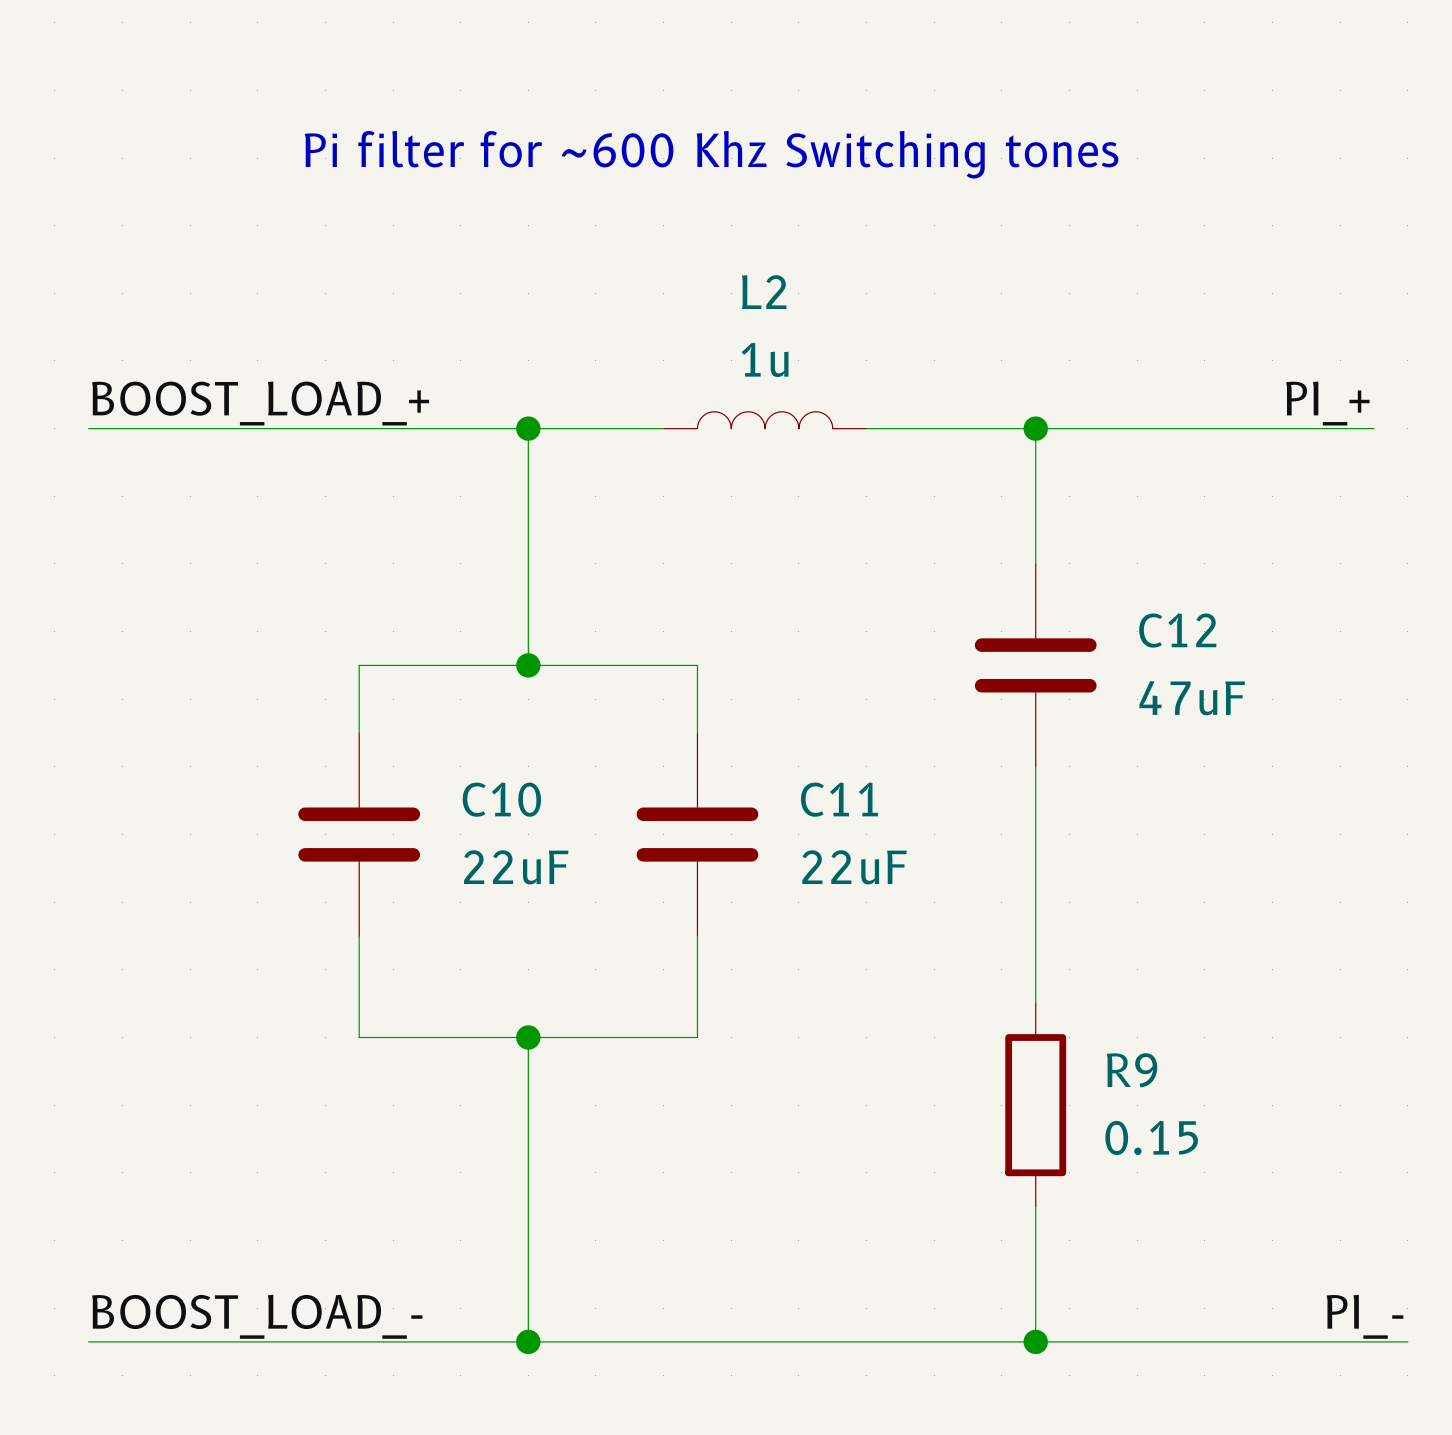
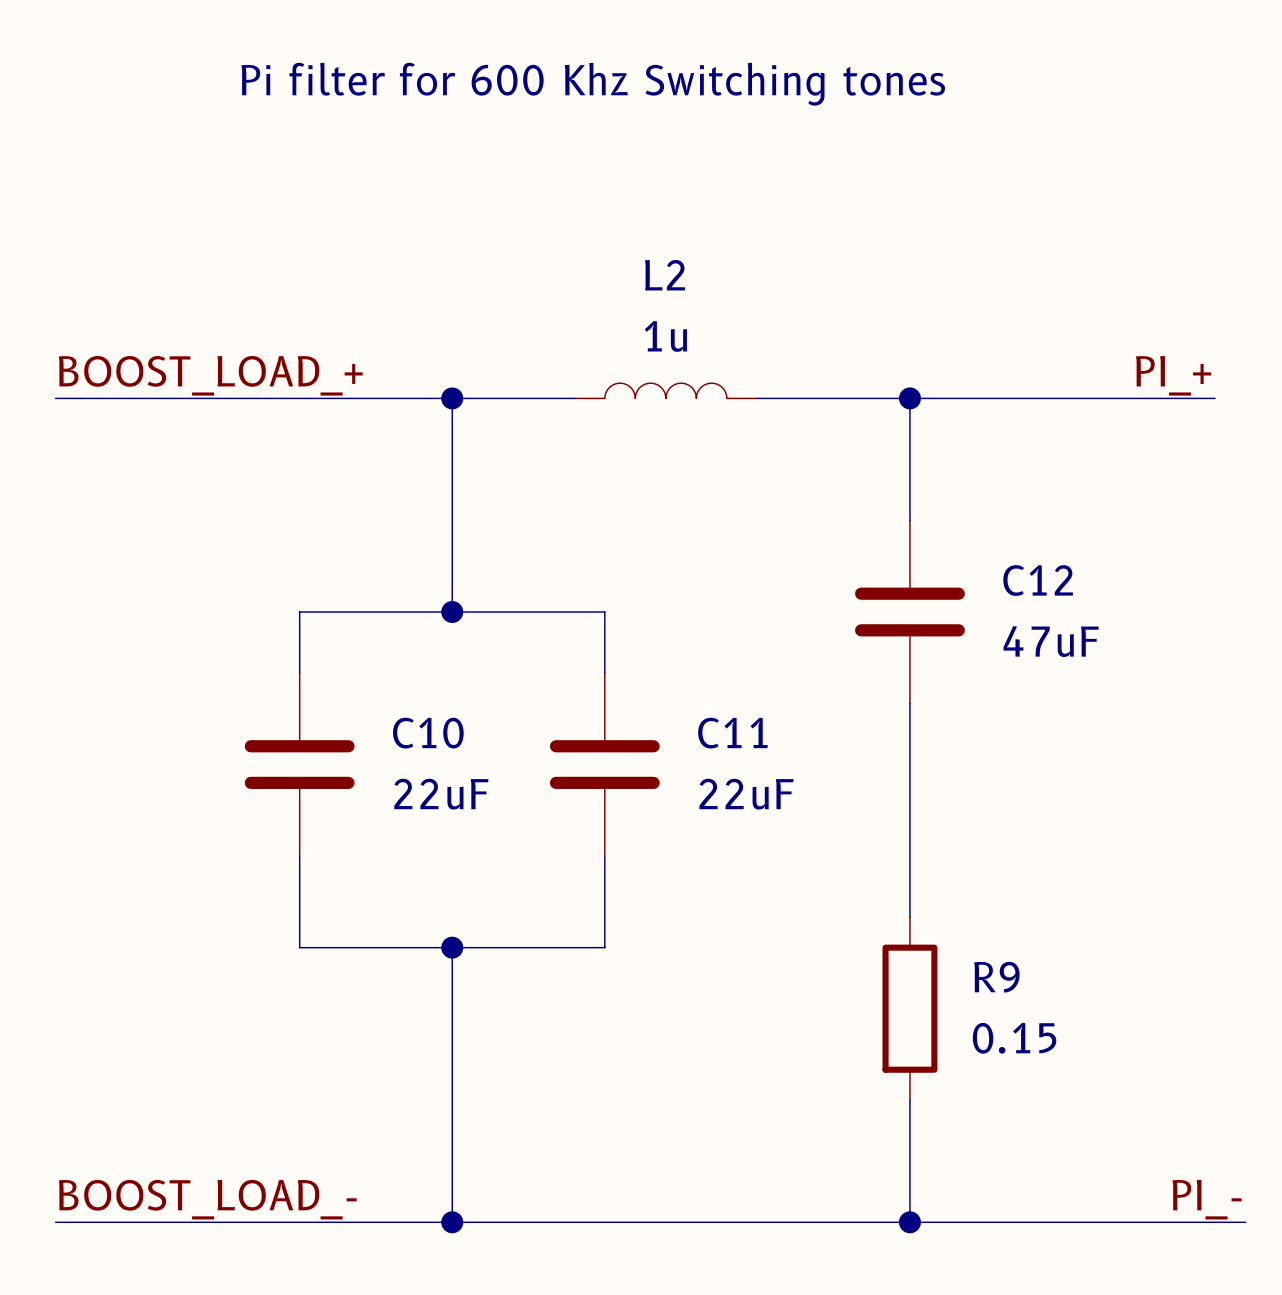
text: none -> Pi filter for 600 Khz Switching tones (593, 84)
text: Pi filter for ~600 Khz Switching tones (711, 154) -> none

